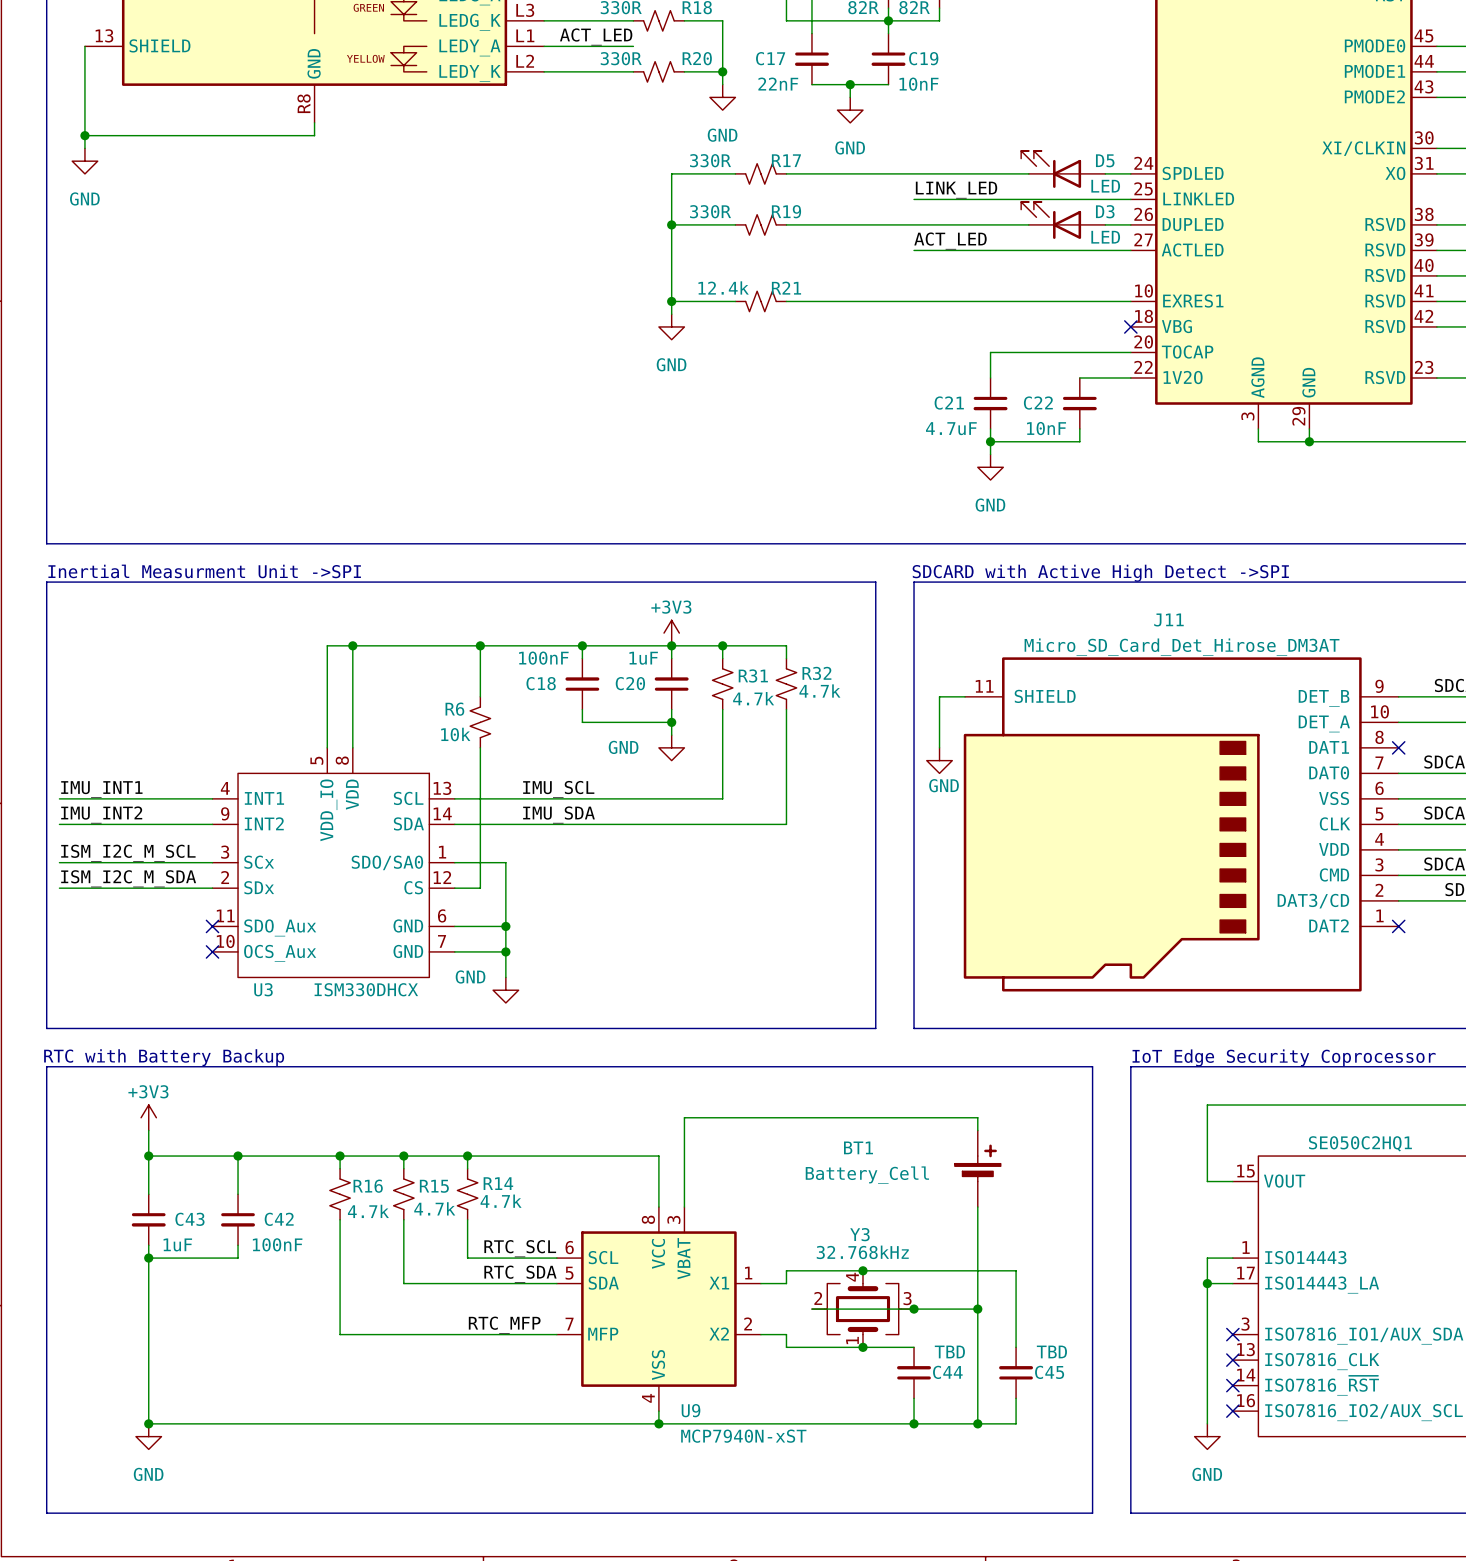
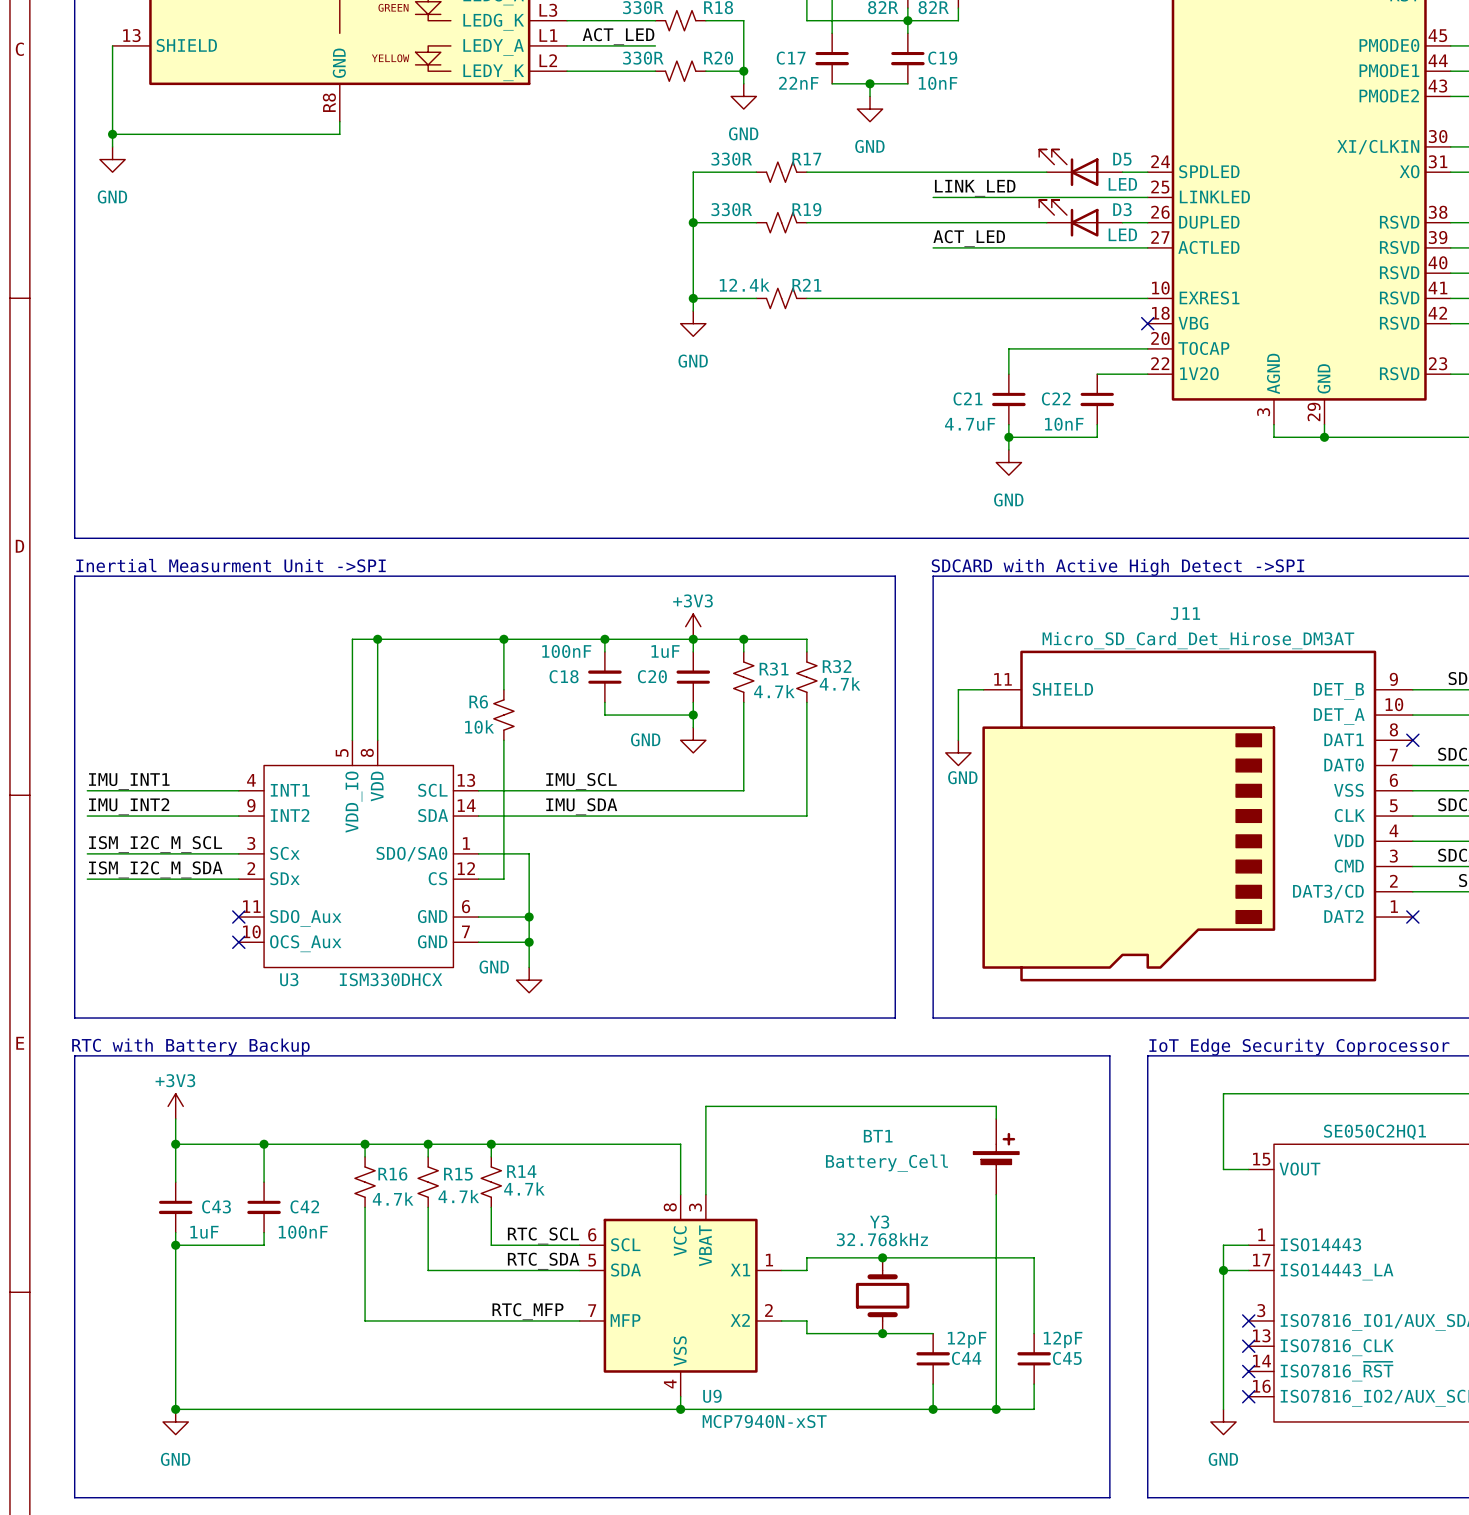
Y3 symbol: [811, 1270, 915, 1348] -> [855, 1257, 910, 1334]
wire: (811, 1309) (977, 1309) -> none
junction: (914, 1309) -> none
junction: (977, 1309) -> none
C44 value: TBD (949, 1351) -> 12pF (967, 1339)
C45 value: TBD (1051, 1351) -> 12pF (1063, 1339)

